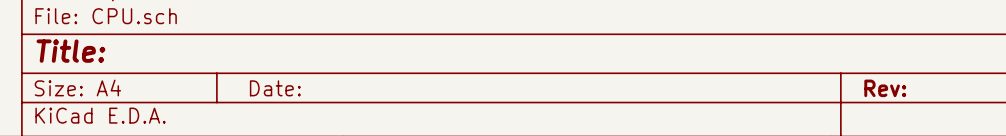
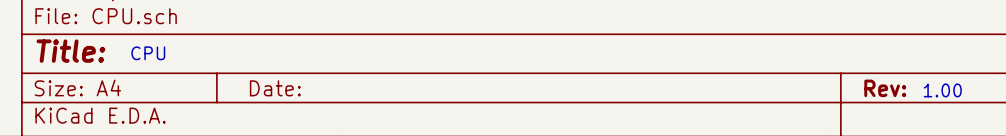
text: none -> CPU (148, 53)
text: none -> 1.00 (942, 90)

